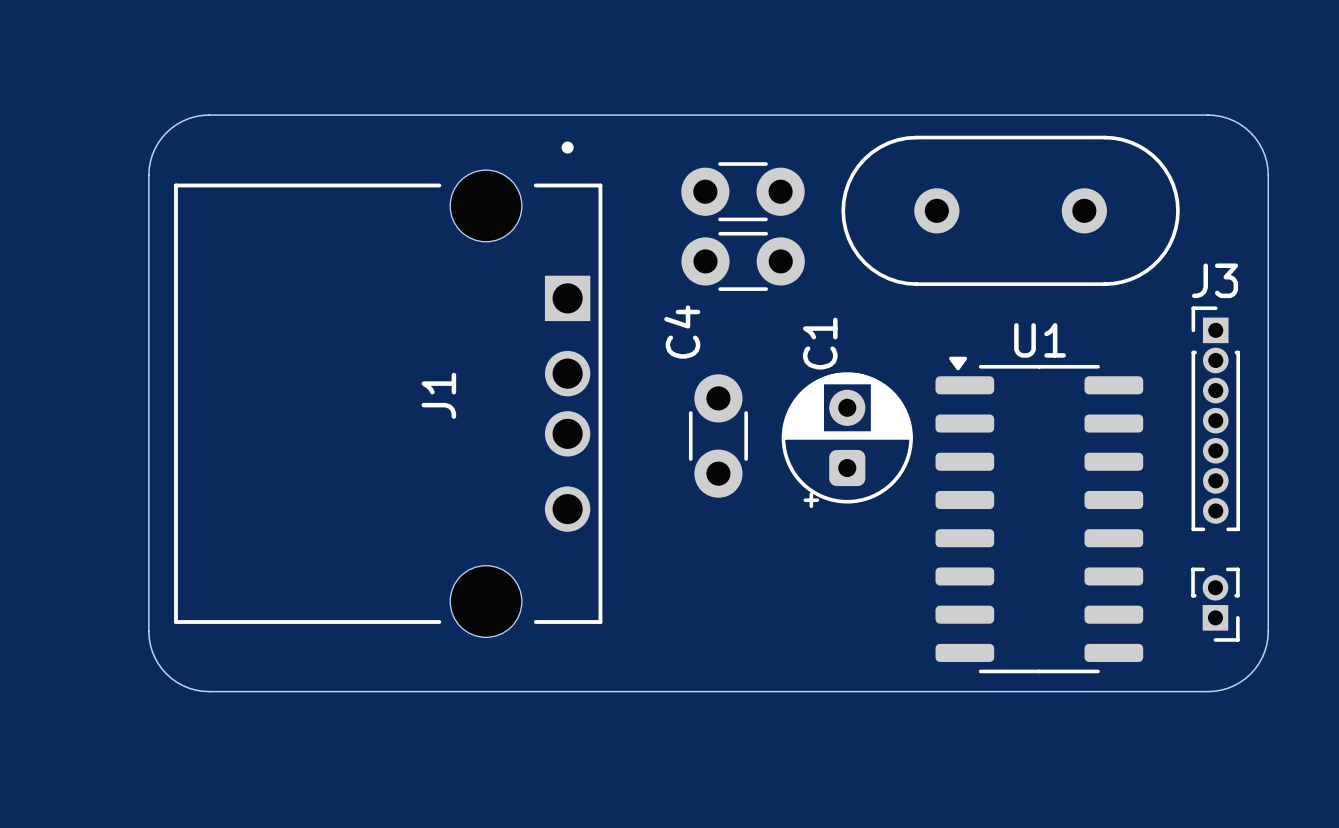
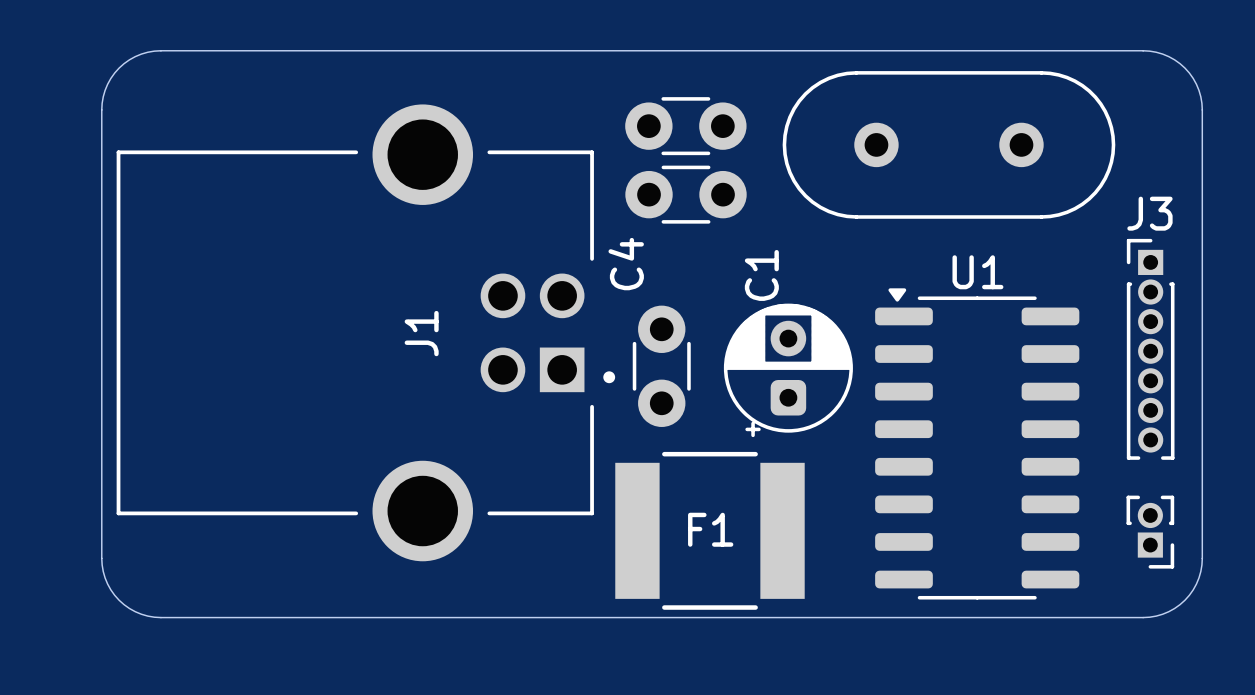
J1 footprint: [174, 141, 603, 638] -> [116, 104, 616, 562]
F1: none -> (709, 530)

